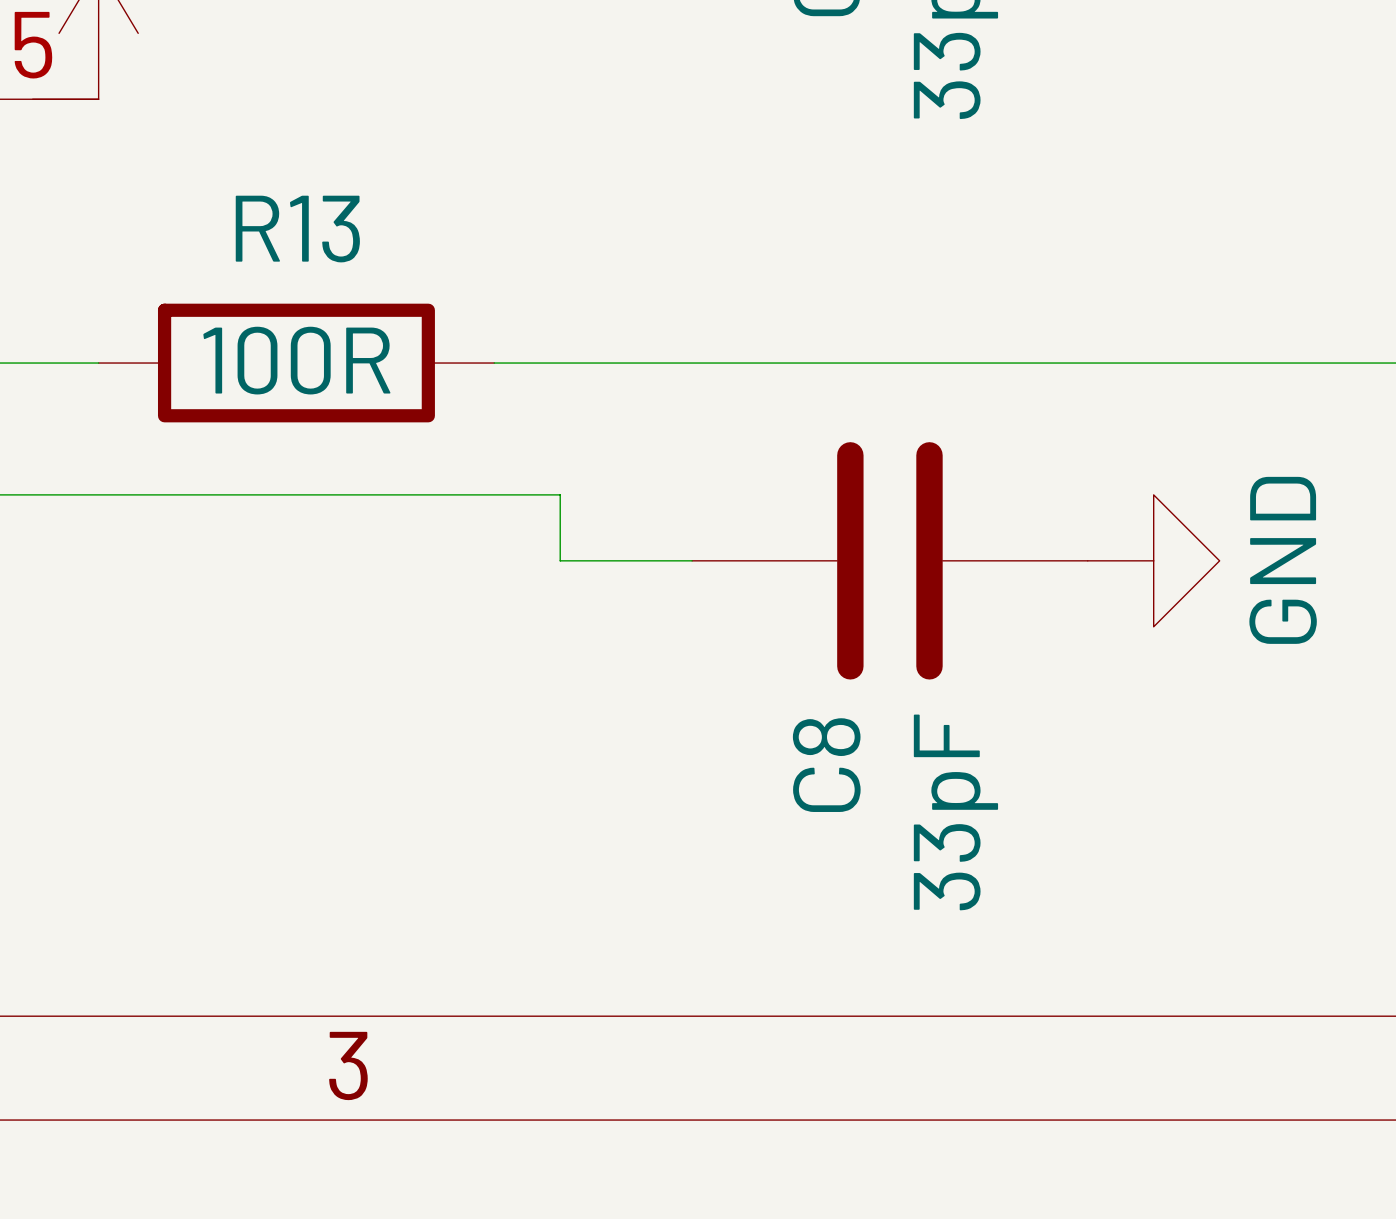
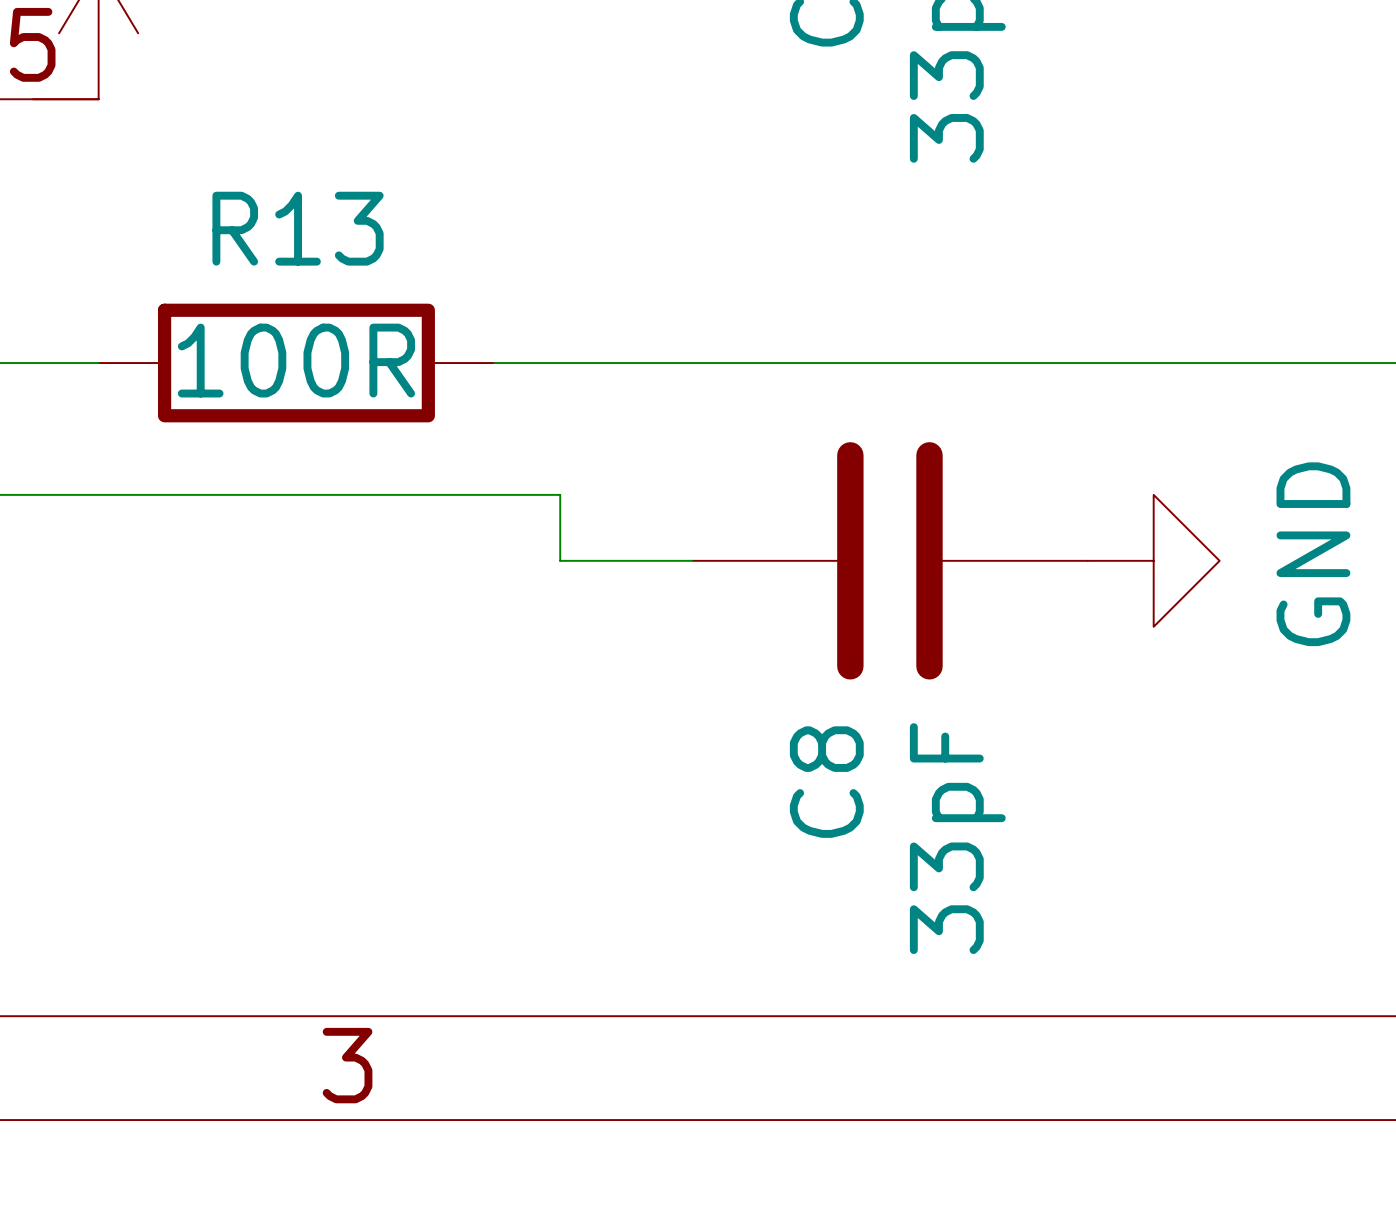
power symbol text position: GND (1283, 560) -> GND (1313, 554)

